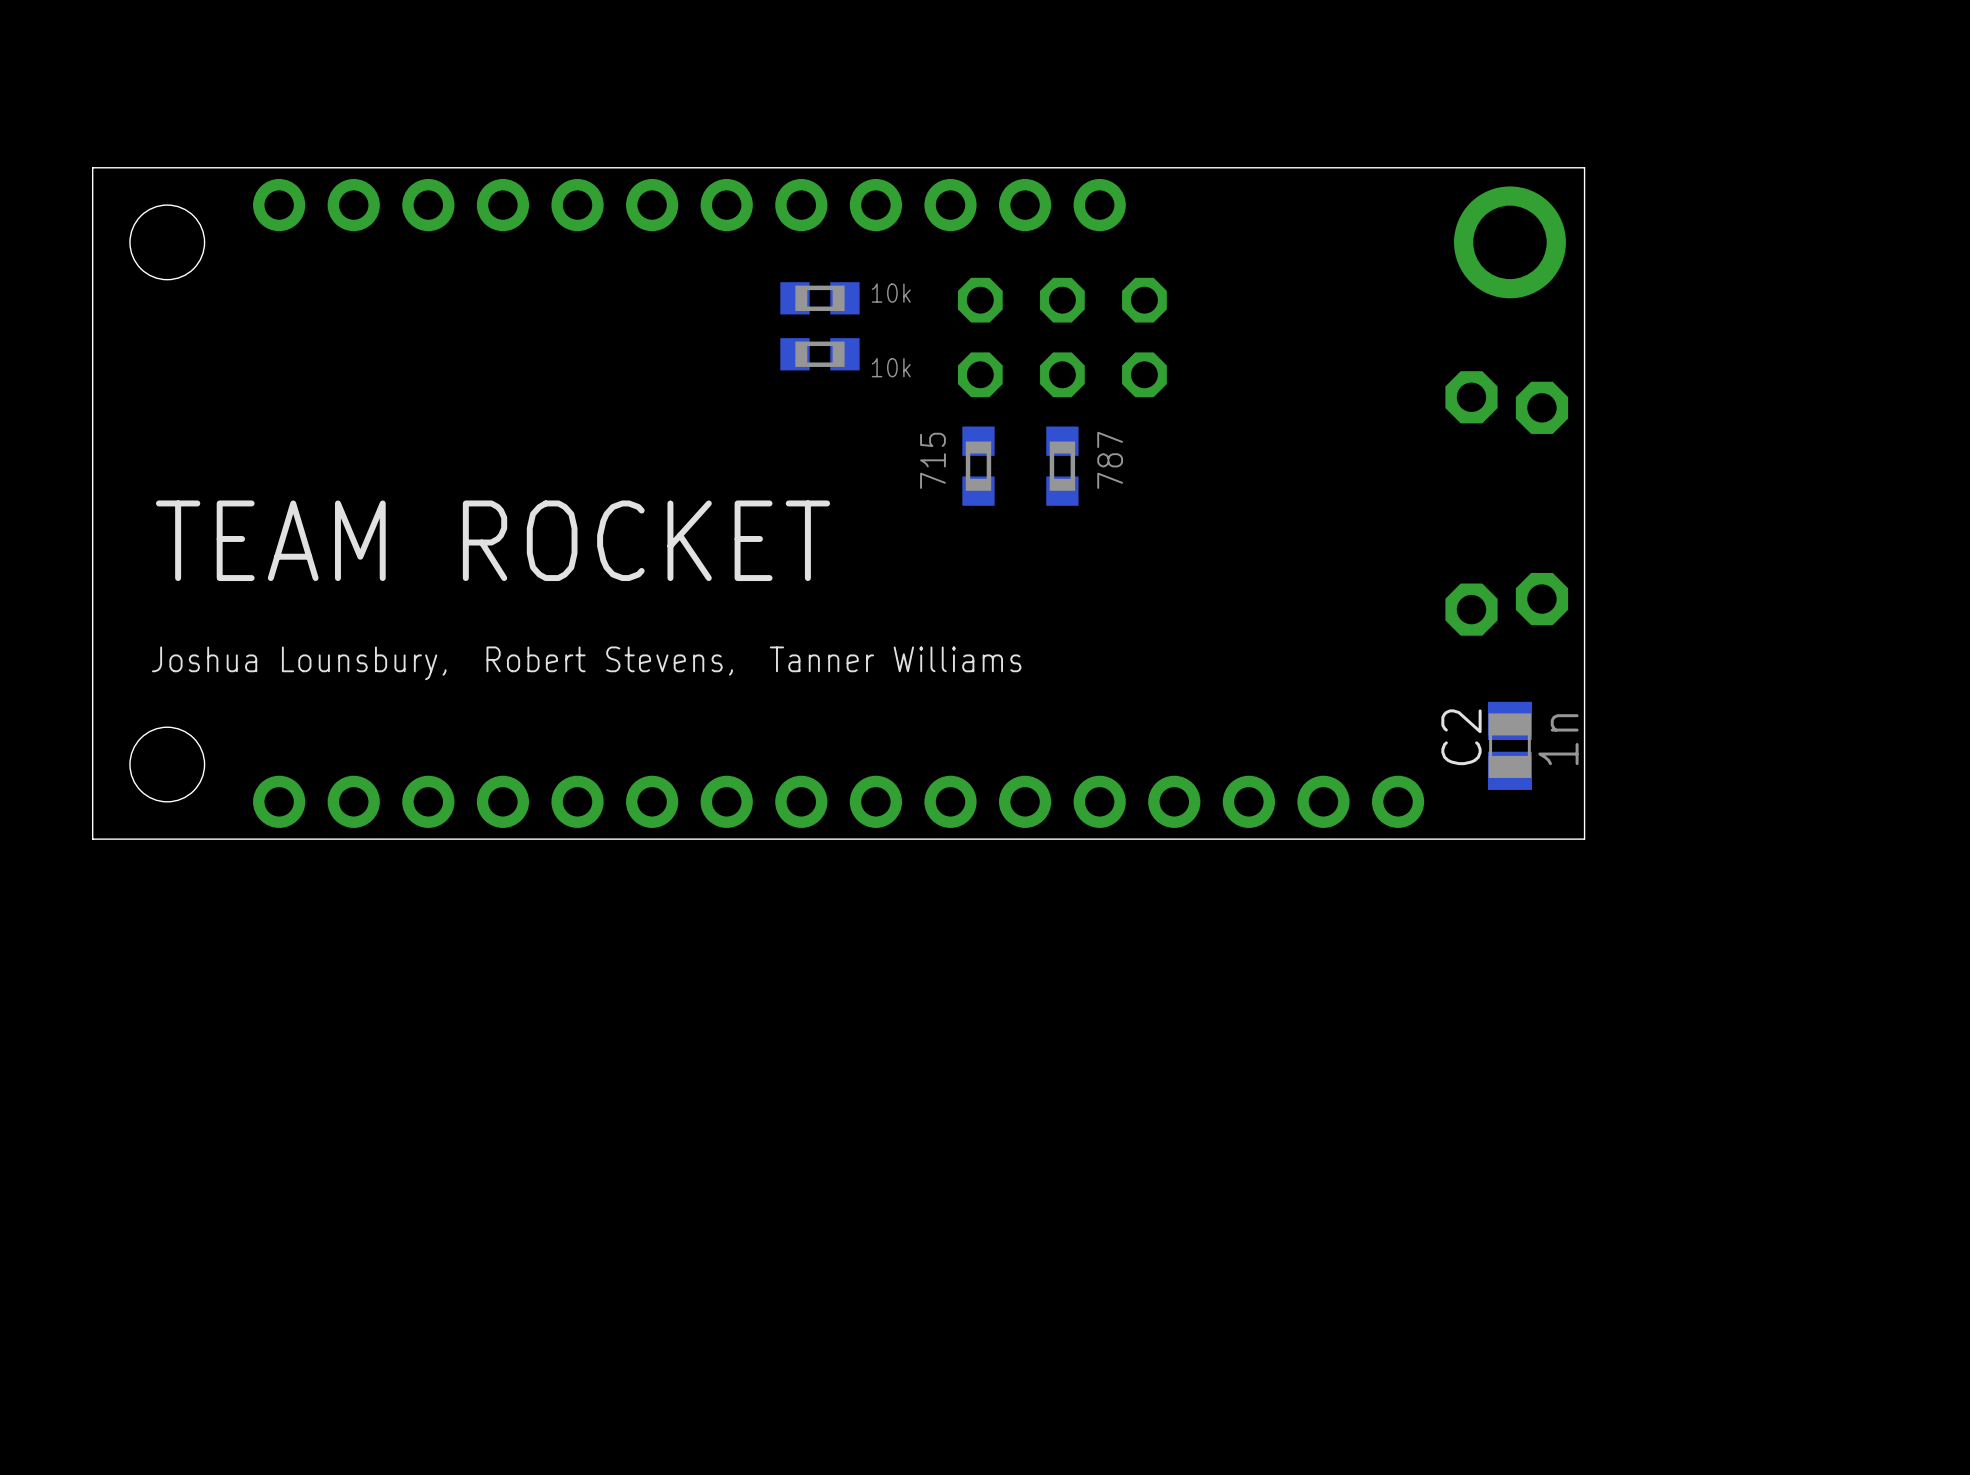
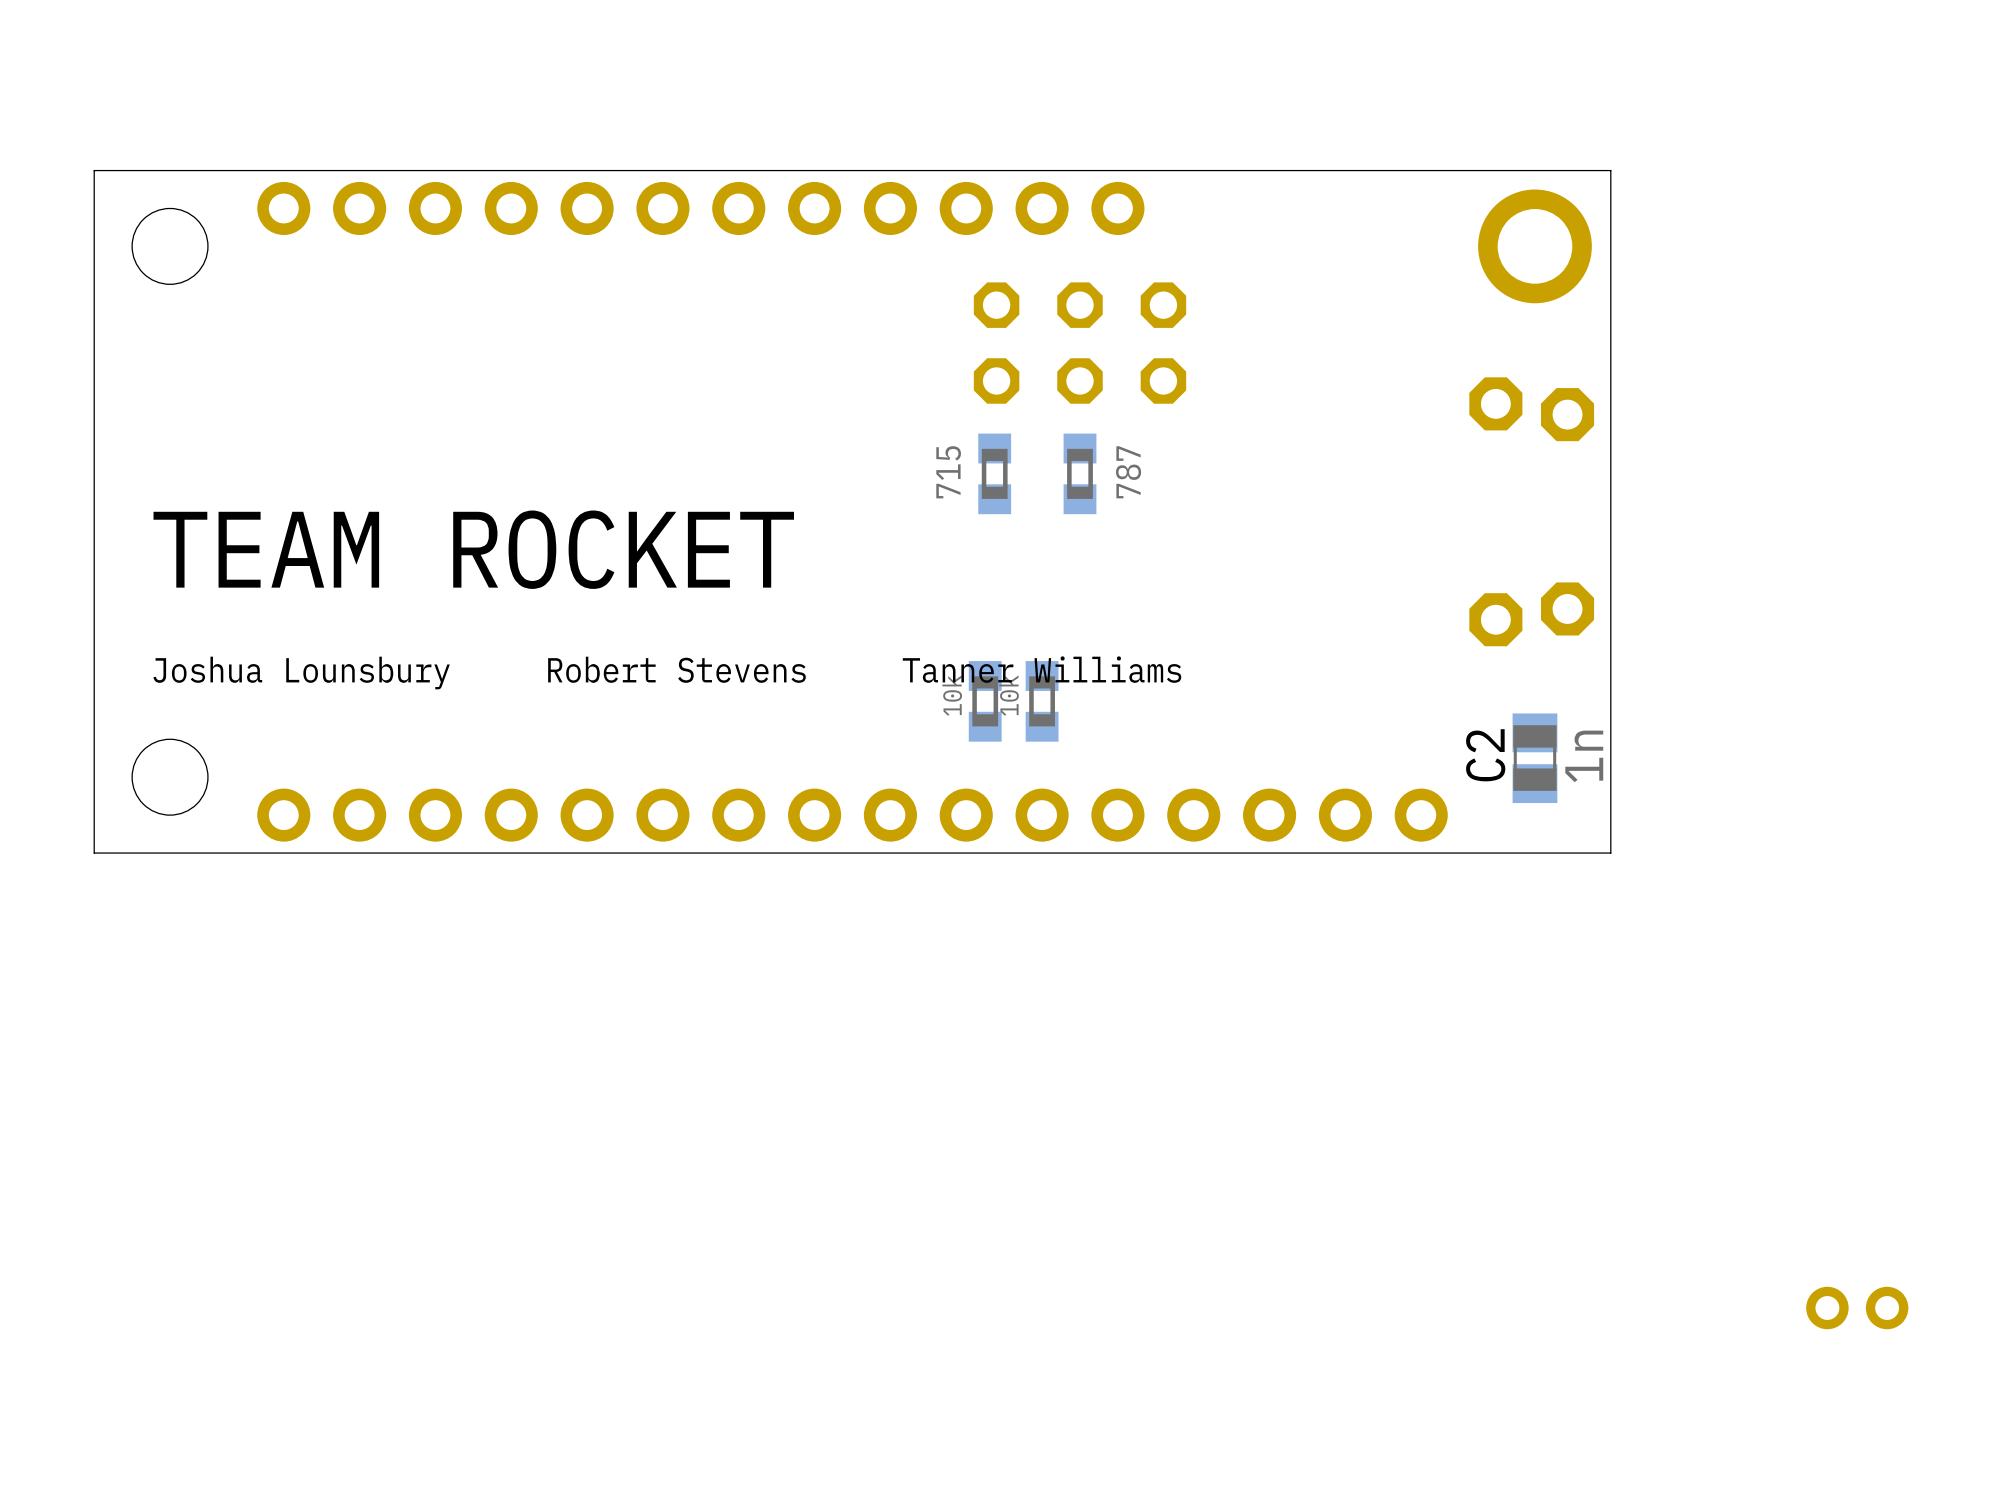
part: 10k (819, 298) -> none
part: 10k (819, 354) -> none
text: Joshua Lounsbury, Robert Stevens, Tanner Williams (586, 663) -> Joshua Lounsbury Robert Stevens Tanner Williams (667, 672)
part: none -> 10k (985, 701)
part: none -> 10k (1042, 701)
part: none -> (1857, 1308)

